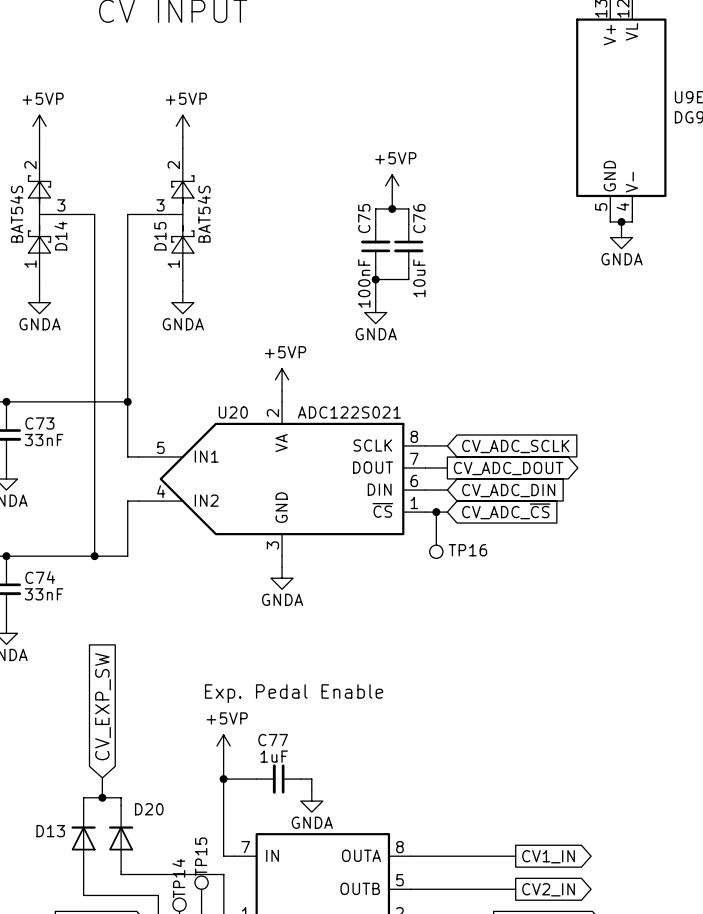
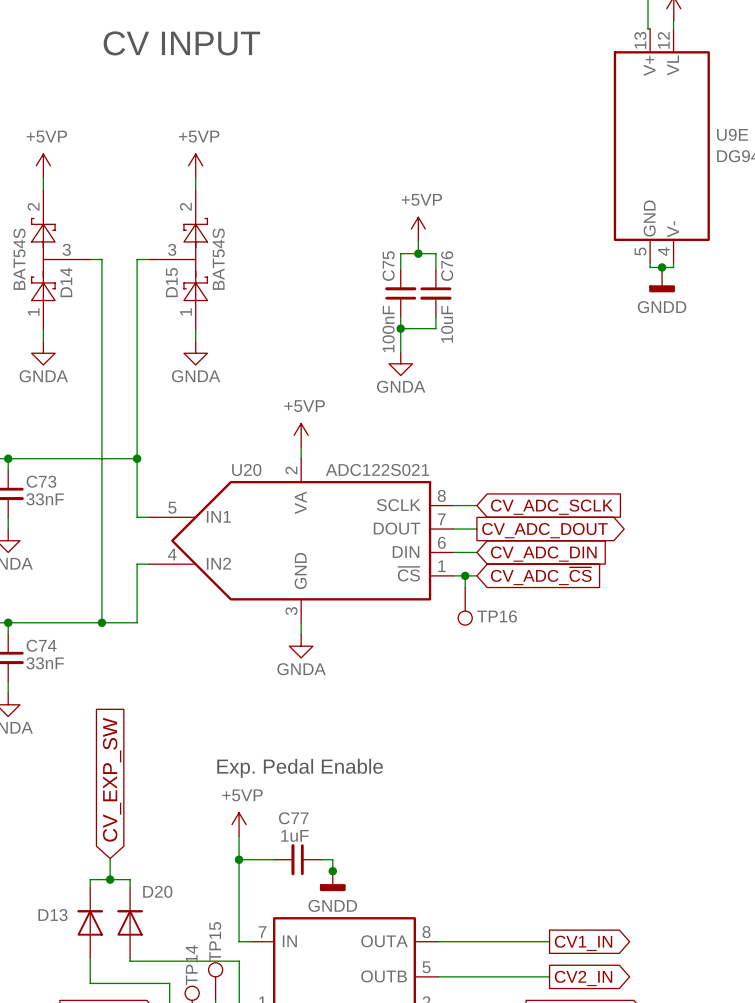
power symbol: GNDA (621, 237) -> GNDD (662, 282)
junction: none -> (332, 871)
power symbol: GNDA (311, 801) -> GNDD (332, 881)

